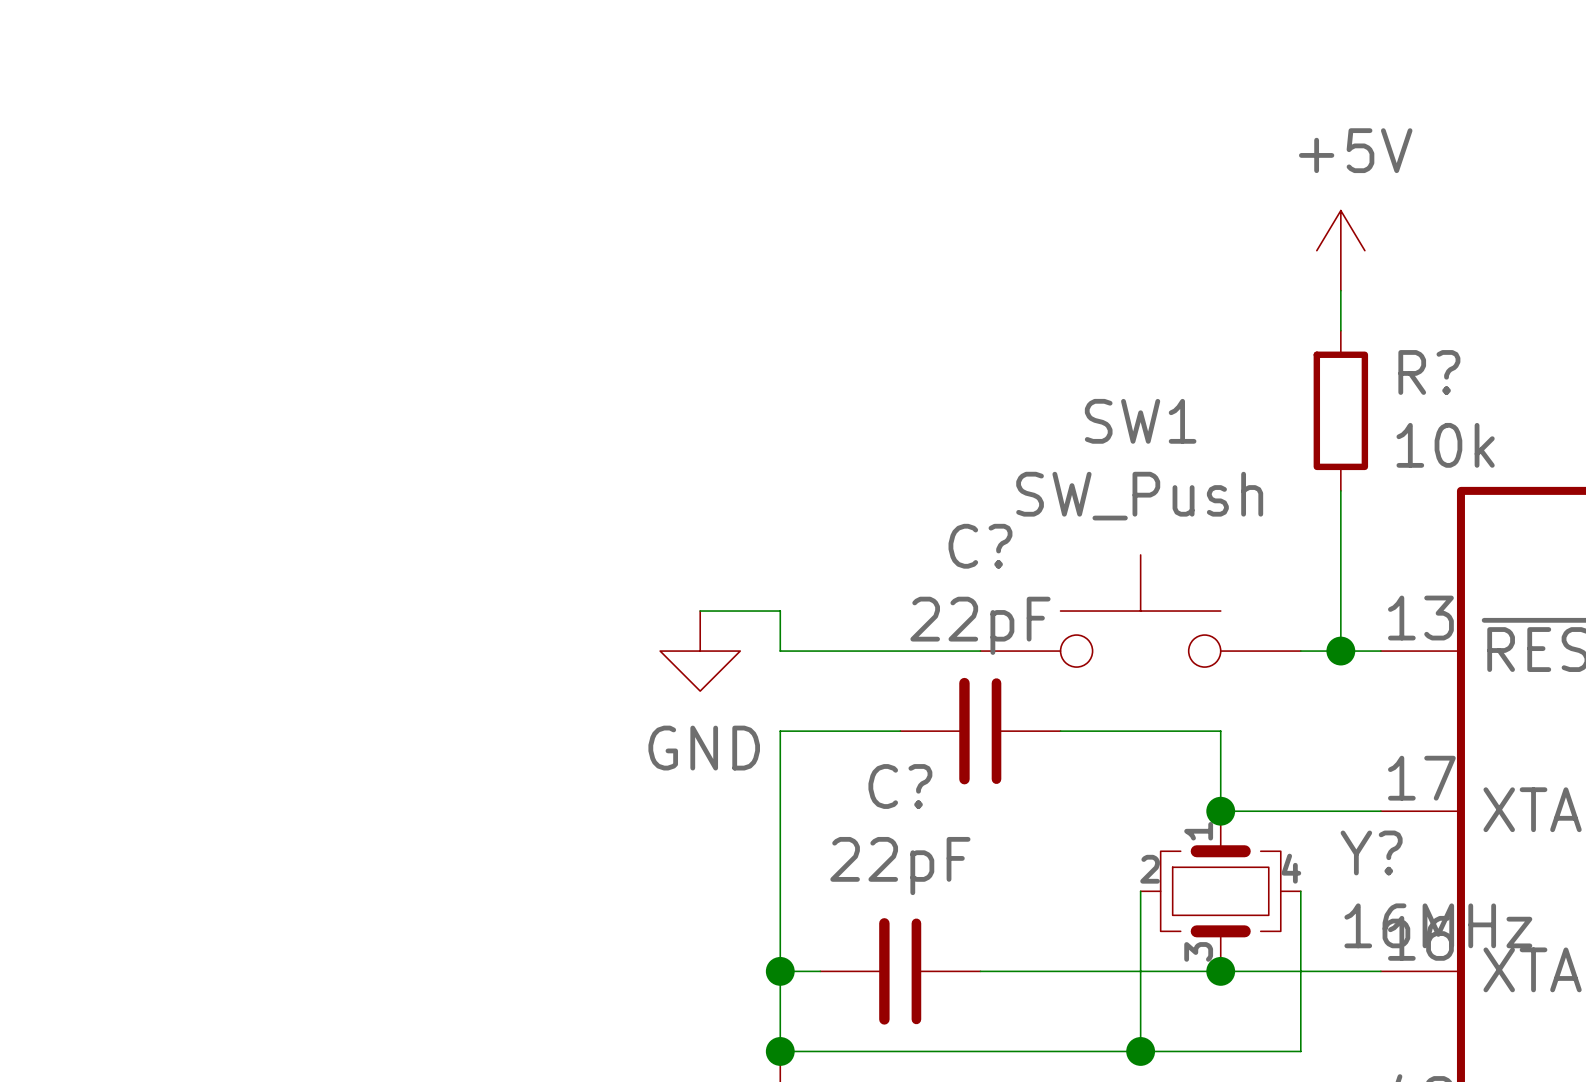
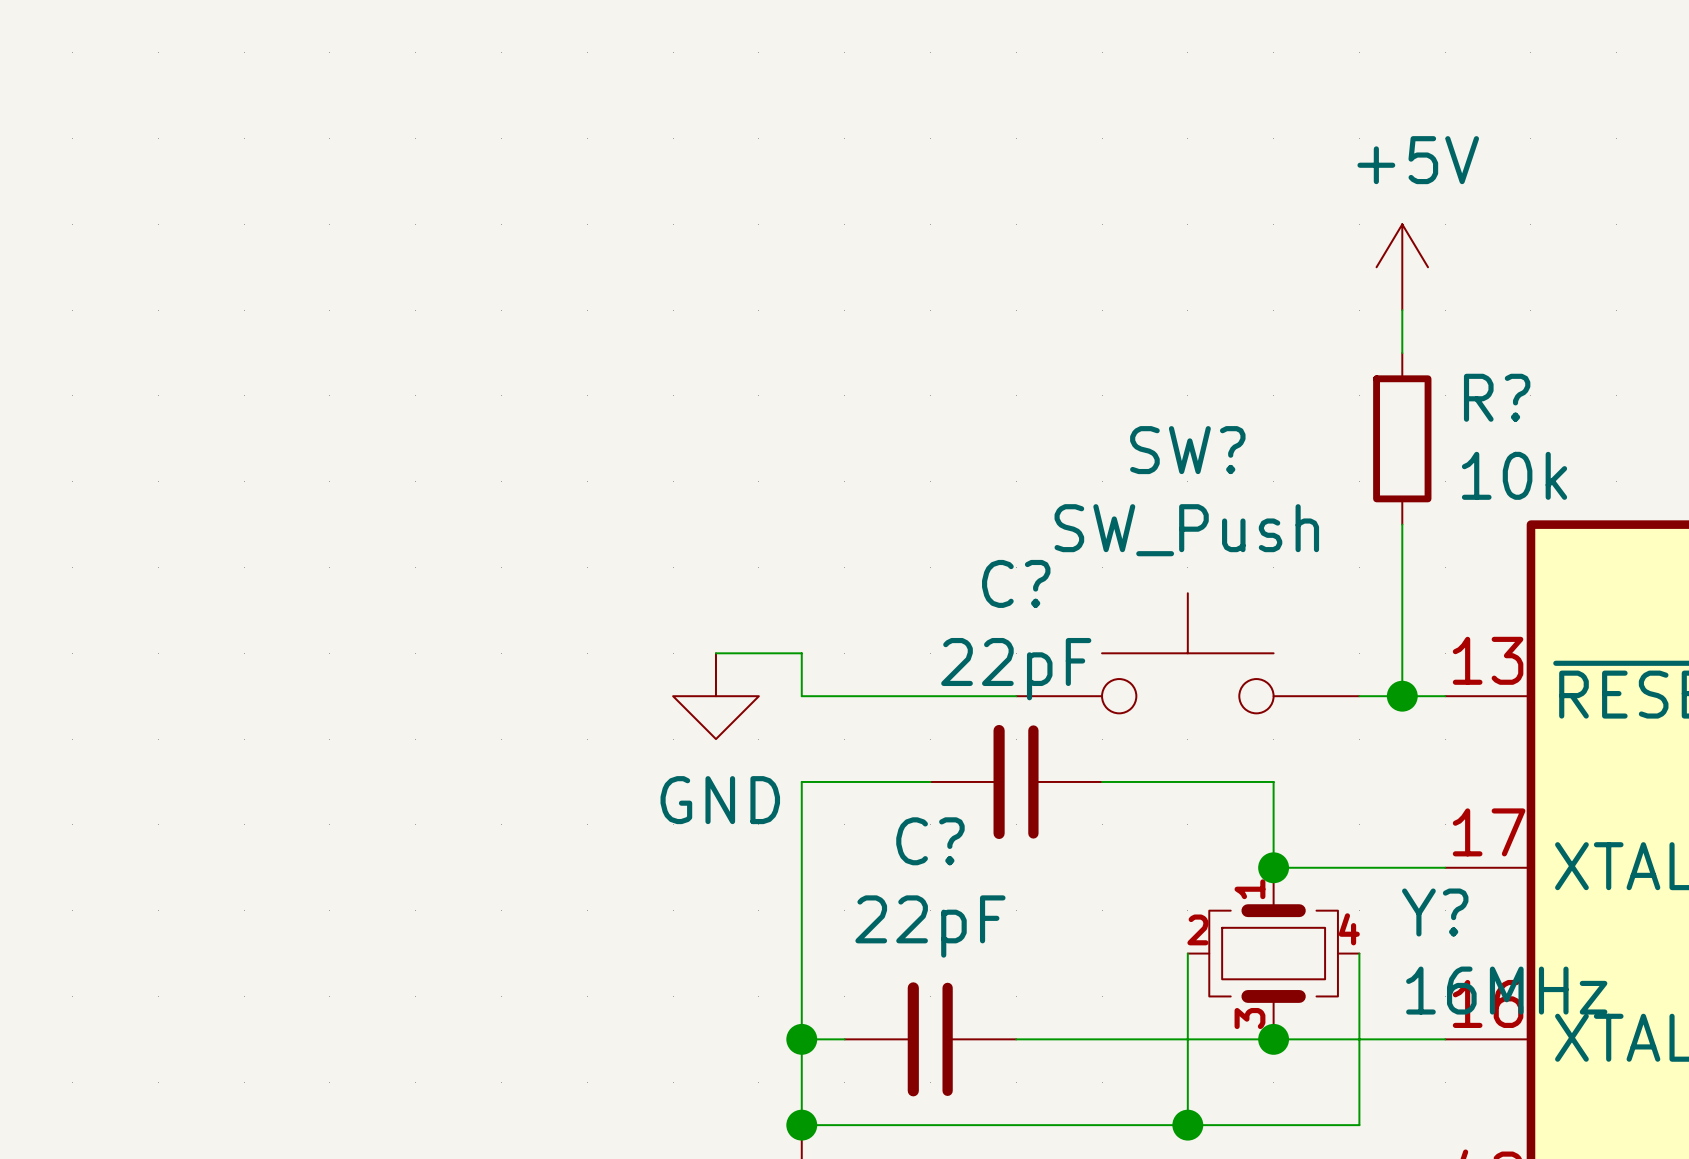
SW1 name: SW1 (1140, 421) -> SW? (1187, 450)

